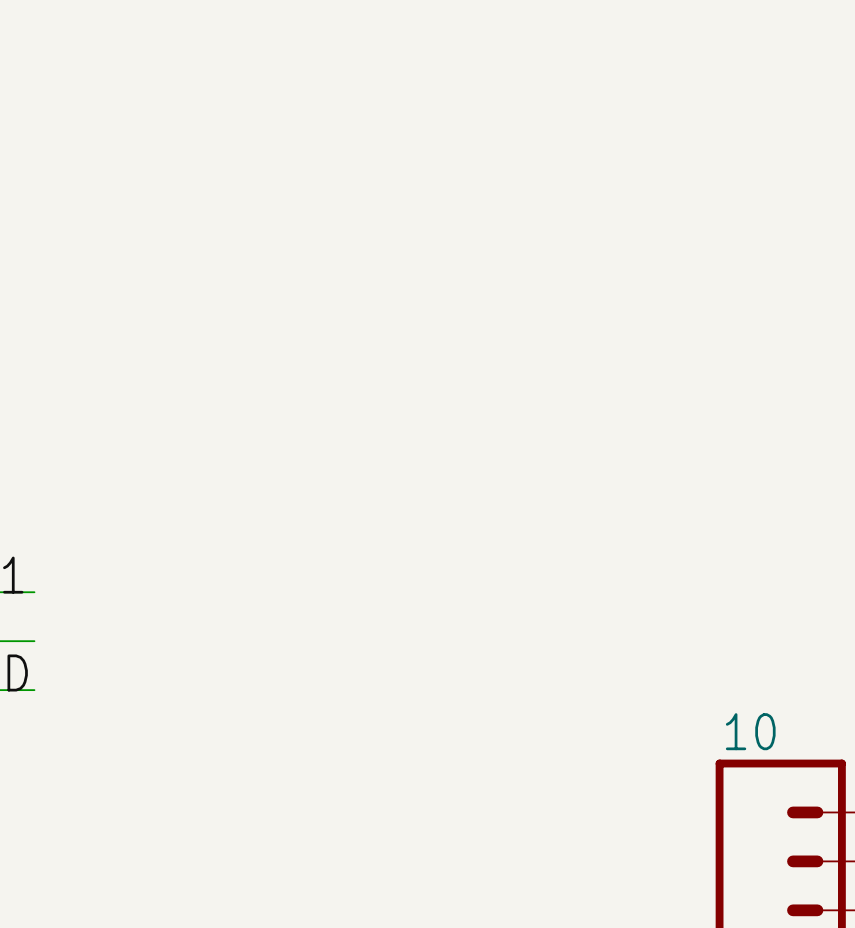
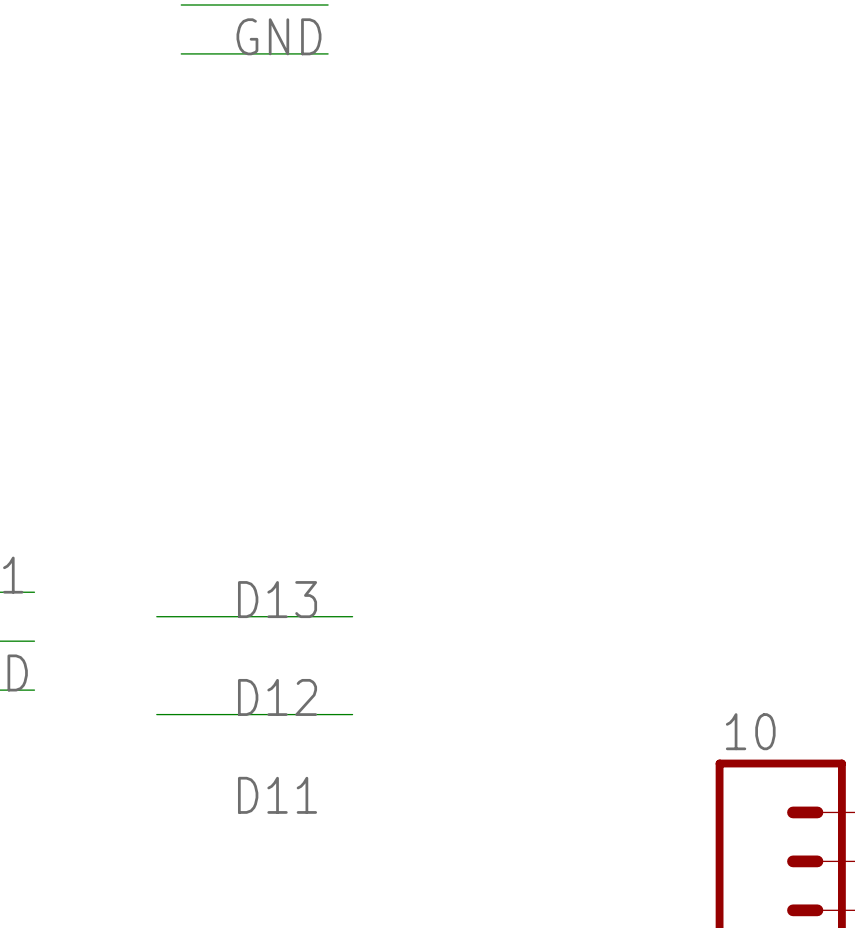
wire: none -> (181, 4) (328, 4)
label: none -> GND (278, 36)
wire: none -> (181, 53) (328, 53)
label: none -> D13 (277, 599)
wire: none -> (156, 616) (352, 616)
label: none -> D12 (277, 697)
wire: none -> (156, 714) (352, 714)
label: none -> D11 (277, 795)

